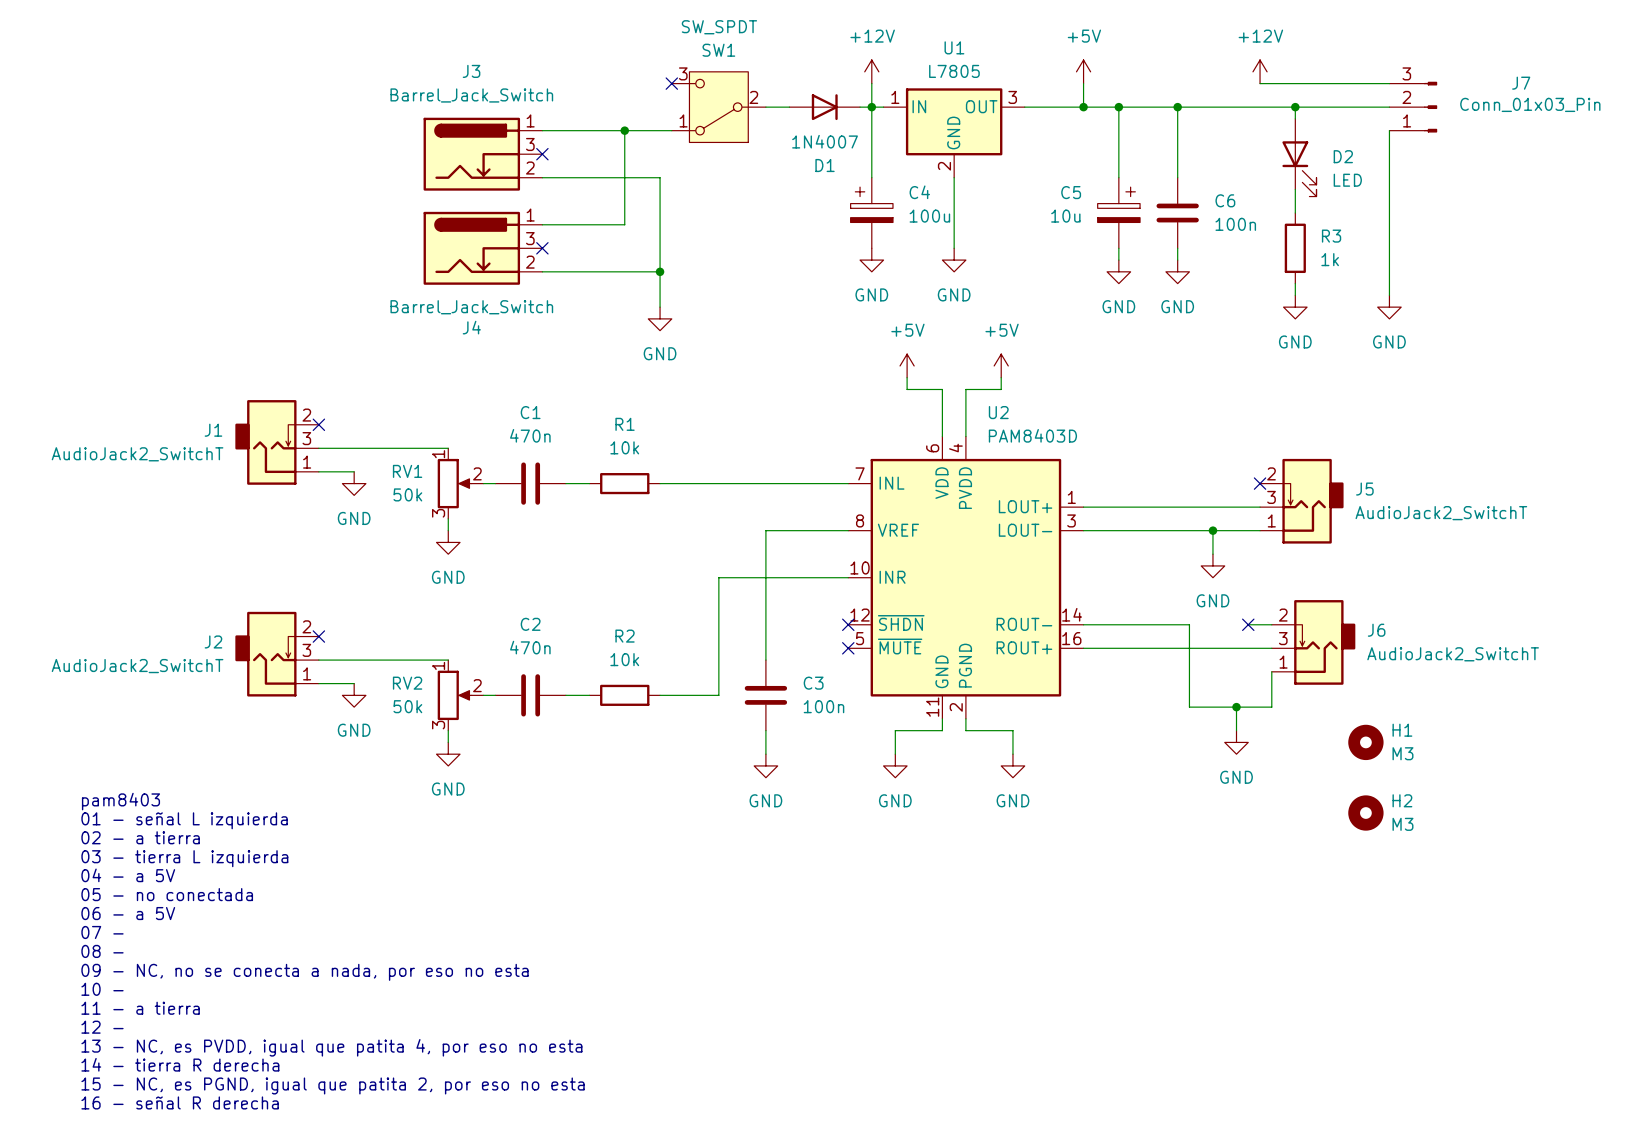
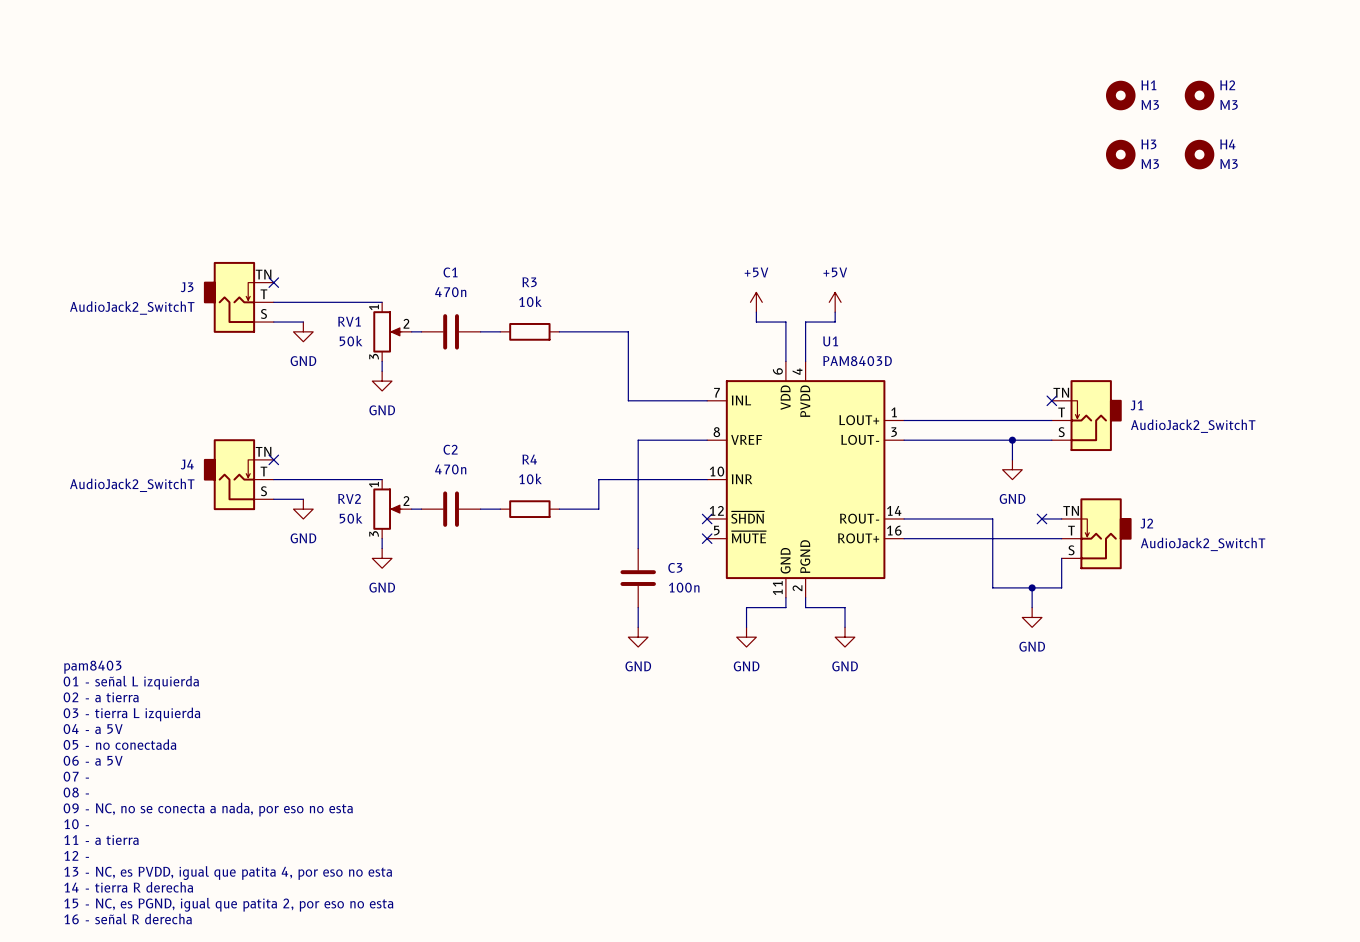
J3 name position: J3 (471, 71) -> J3 (187, 287)
power symbol: +12V (871, 71) -> none
power symbol: +5V (1083, 71) -> none
power symbol: +12V (1260, 71) -> none
no-connect mark: (671, 83) -> none
wire: (871, 83) (871, 177) -> none
wire: (1083, 83) (1083, 107) -> none
wire: (1260, 83) (1389, 83) -> none
J3 value: Barrel_Jack_Switch (471, 95) -> AudioJack2_SwitchT (132, 308)
SW1: SW_SPDT (718, 107) -> none
wire: (765, 107) (789, 107) -> none
D1: 1N4007 (824, 107) -> none
wire: (860, 107) (883, 107) -> none
junction: (871, 107) -> none
wire: (1024, 107) (1389, 107) -> none
junction: (1083, 107) -> none
wire: (1118, 107) (1118, 177) -> none
junction: (1118, 107) -> none
wire: (1177, 107) (1177, 177) -> none
junction: (1177, 107) -> none
wire: (1295, 107) (1295, 118) -> none
junction: (1295, 107) -> none
J7: Conn_01x03_Pin (1413, 107) -> none
J3 symbol: [423, 117, 543, 191] -> [203, 261, 274, 333]
wire: (542, 130) (671, 130) -> none
wire: (624, 130) (624, 224) (542, 224) -> none
junction: (624, 130) -> none
wire: (1389, 130) (1389, 295) -> none
U1: L7805 (954, 133) -> none
no-connect mark: (542, 154) -> none
D2: LED (1299, 157) -> none
wire: (542, 177) (660, 177) (660, 307) -> none
wire: (954, 177) (954, 248) -> none
wire: (1295, 189) (1295, 213) -> none
H3: none -> M3 (1120, 154)
H4: none -> M3 (1199, 154)
J4 symbol: [423, 211, 543, 285] -> [203, 439, 274, 511]
C4: 100u (871, 213) -> none
C5: 10u (1118, 213) -> none
C6: 100n (1177, 213) -> none
R3 name position: R3 (1331, 236) -> R3 (529, 282)
no-connect mark: (542, 248) -> none
wire: (1118, 248) (1118, 260) -> none
wire: (1177, 248) (1177, 260) -> none
R3 rotation: 0° (1295, 248) -> 90° clockwise (529, 331)
R3 position: (1295, 248) -> (529, 331)
R3 value: 1k (1330, 259) -> 10k (530, 301)
power symbol: GND (871, 260) -> none
power symbol: GND (954, 260) -> none
wire: (542, 271) (660, 271) -> none
junction: (660, 271) -> none
power symbol: GND (1118, 271) -> none
power symbol: GND (1177, 271) -> none
wire: (1295, 283) (1295, 295) -> none
J4 value: Barrel_Jack_Switch (471, 307) -> AudioJack2_SwitchT (132, 485)
power symbol: GND (1295, 307) -> none
power symbol: GND (1389, 307) -> none
power symbol: GND (660, 318) -> none
J4 name position: J4 (471, 327) -> J4 (187, 464)
no-connect mark: none -> (273, 282)
J1 symbol: [235, 400, 319, 485] -> [1051, 380, 1122, 452]
power symbol: none -> GND (303, 331)
U2 name: U2 (998, 412) -> U1 (830, 341)
no-connect mark: (318, 424) -> none
J1 name position: J1 (213, 430) -> J1 (1136, 405)
wire: (318, 448) (448, 448) -> (273, 302) (382, 302)
J1 value position: AudioJack2_SwitchT (137, 454) -> AudioJack2_SwitchT (1193, 426)
power symbol: none -> GND (382, 381)
wire: (318, 471) (354, 471) -> (273, 322) (303, 322)
power symbol: GND (354, 483) -> none
RV1 position: (460, 483) -> (392, 331)
wire: (483, 483) (495, 483) -> (411, 331) (421, 331)
C1 position: (530, 483) -> (451, 331)
wire: (565, 483) (589, 483) -> (480, 331) (500, 331)
R1: 10k (624, 483) -> none
wire: (660, 483) (754, 483) -> (559, 331) (628, 331) (628, 400)
J5: AudioJack2_SwitchT (1301, 501) -> none
wire: (448, 518) (448, 530) -> (382, 361) (382, 371)
power symbol: GND (448, 542) -> none
no-connect mark: none -> (273, 459)
J2 symbol: [235, 611, 319, 697] -> [1061, 498, 1132, 570]
power symbol: none -> GND (303, 509)
R4: none -> 10k (529, 509)
wire: (718, 613) (718, 695) (660, 695) -> (598, 509) (559, 509)
no-connect mark: (318, 636) -> none
J2 name position: J2 (213, 641) -> J2 (1146, 523)
J6: AudioJack2_SwitchT (1313, 642) -> none
wire: (318, 660) (448, 660) -> (273, 479) (382, 479)
J2 value position: AudioJack2_SwitchT (137, 666) -> AudioJack2_SwitchT (1203, 544)
power symbol: none -> GND (382, 558)
wire: (318, 683) (354, 683) -> (273, 499) (303, 499)
power symbol: GND (354, 695) -> none
RV2 position: (460, 695) -> (392, 509)
wire: (483, 695) (495, 695) -> (411, 509) (421, 509)
C2 position: (530, 695) -> (451, 509)
wire: (565, 695) (589, 695) -> (480, 509) (500, 509)
R2: 10k (624, 695) -> none
wire: (448, 730) (448, 742) -> (382, 538) (382, 548)
H1 position: (1365, 742) -> (1120, 95)
power symbol: GND (448, 754) -> none
H2 position: (1365, 813) -> (1199, 95)

